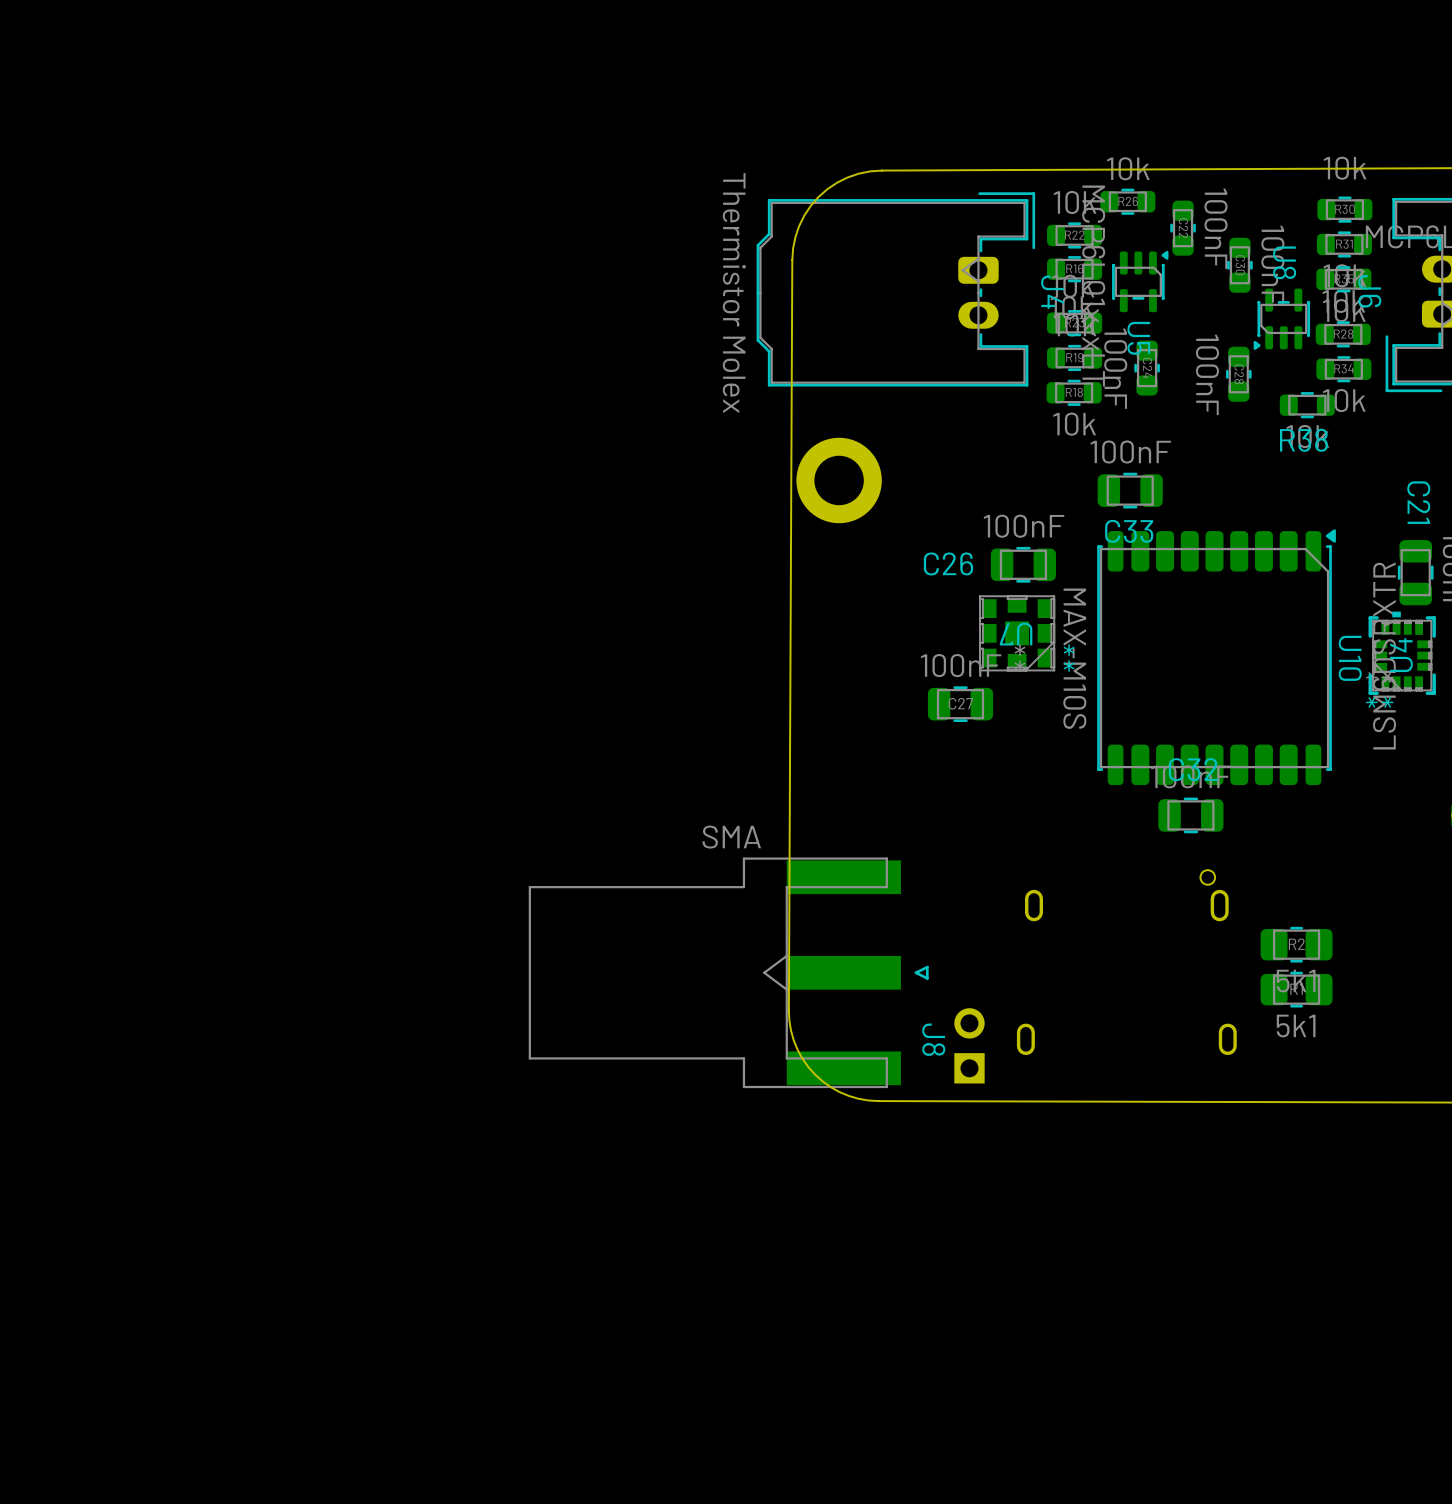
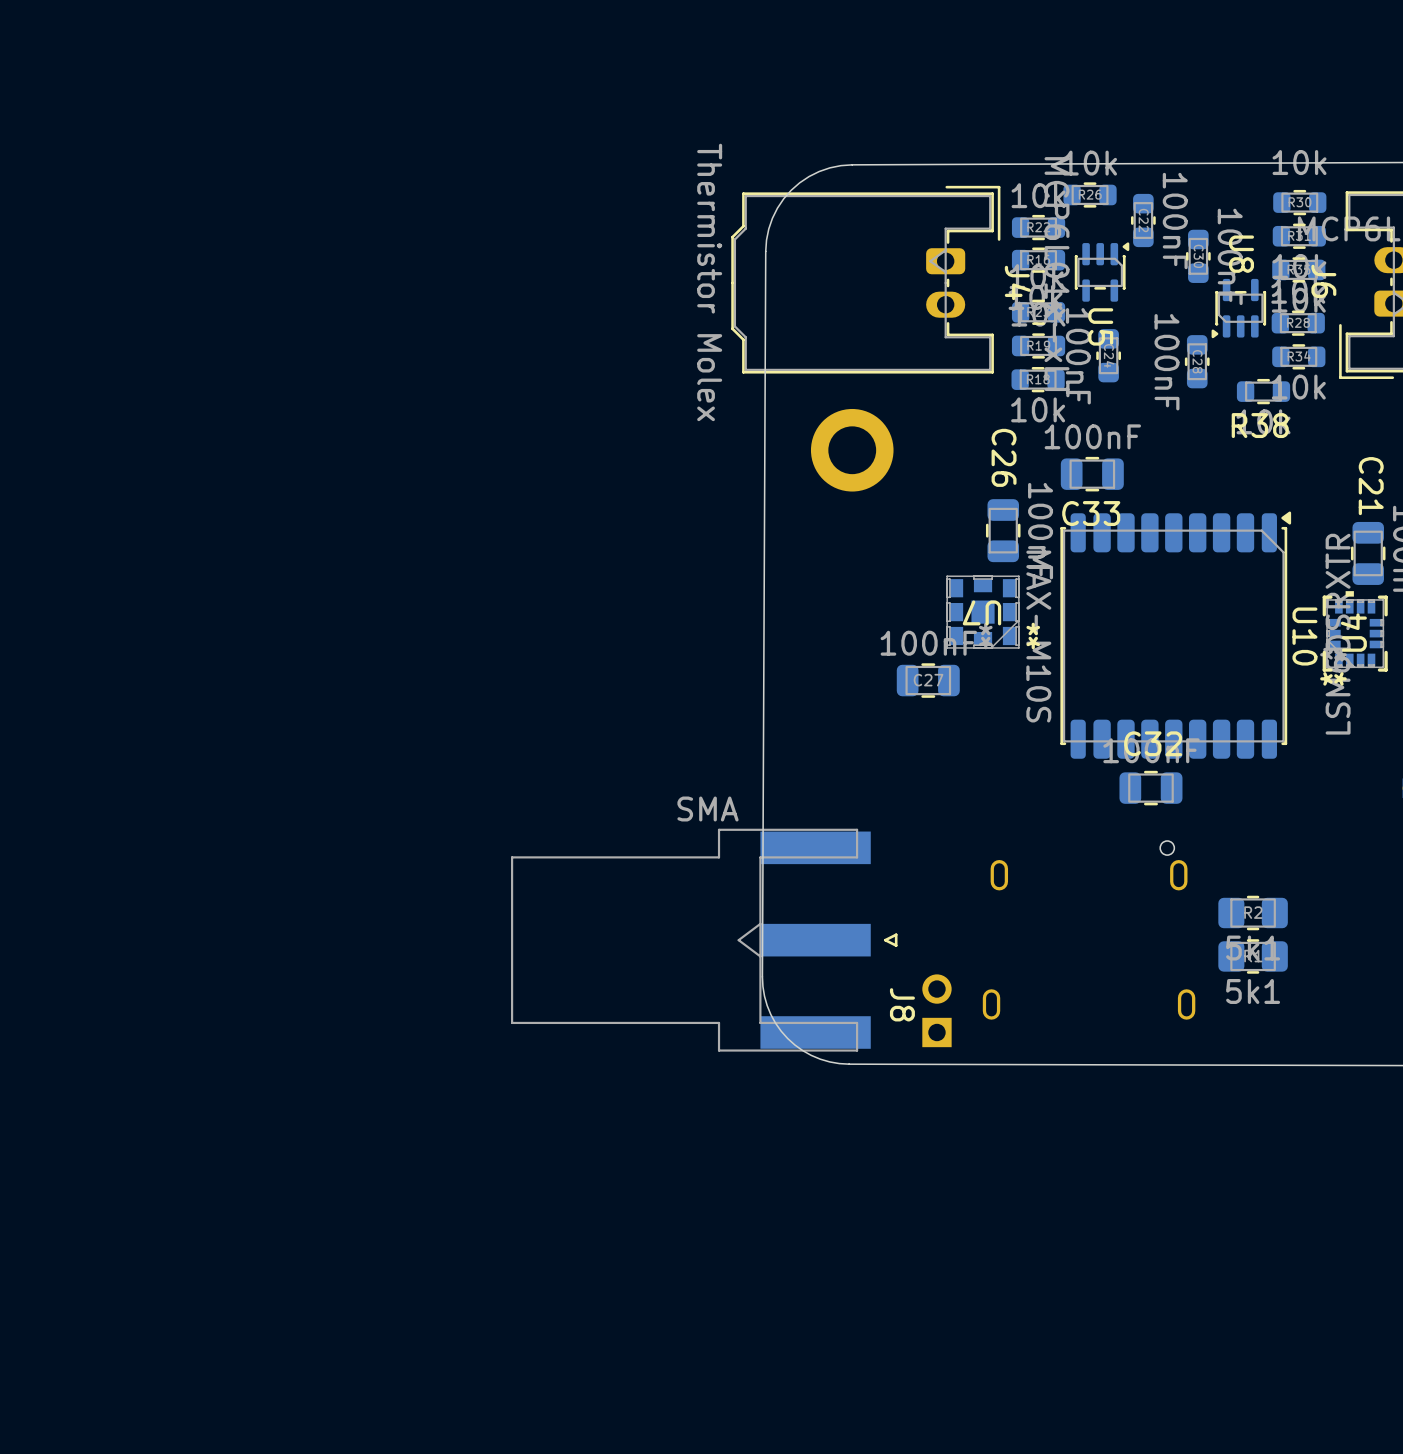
part position: (839, 480) -> (852, 450)
C26 rotation: 0° (1023, 564) -> 90° clockwise (1003, 530)

